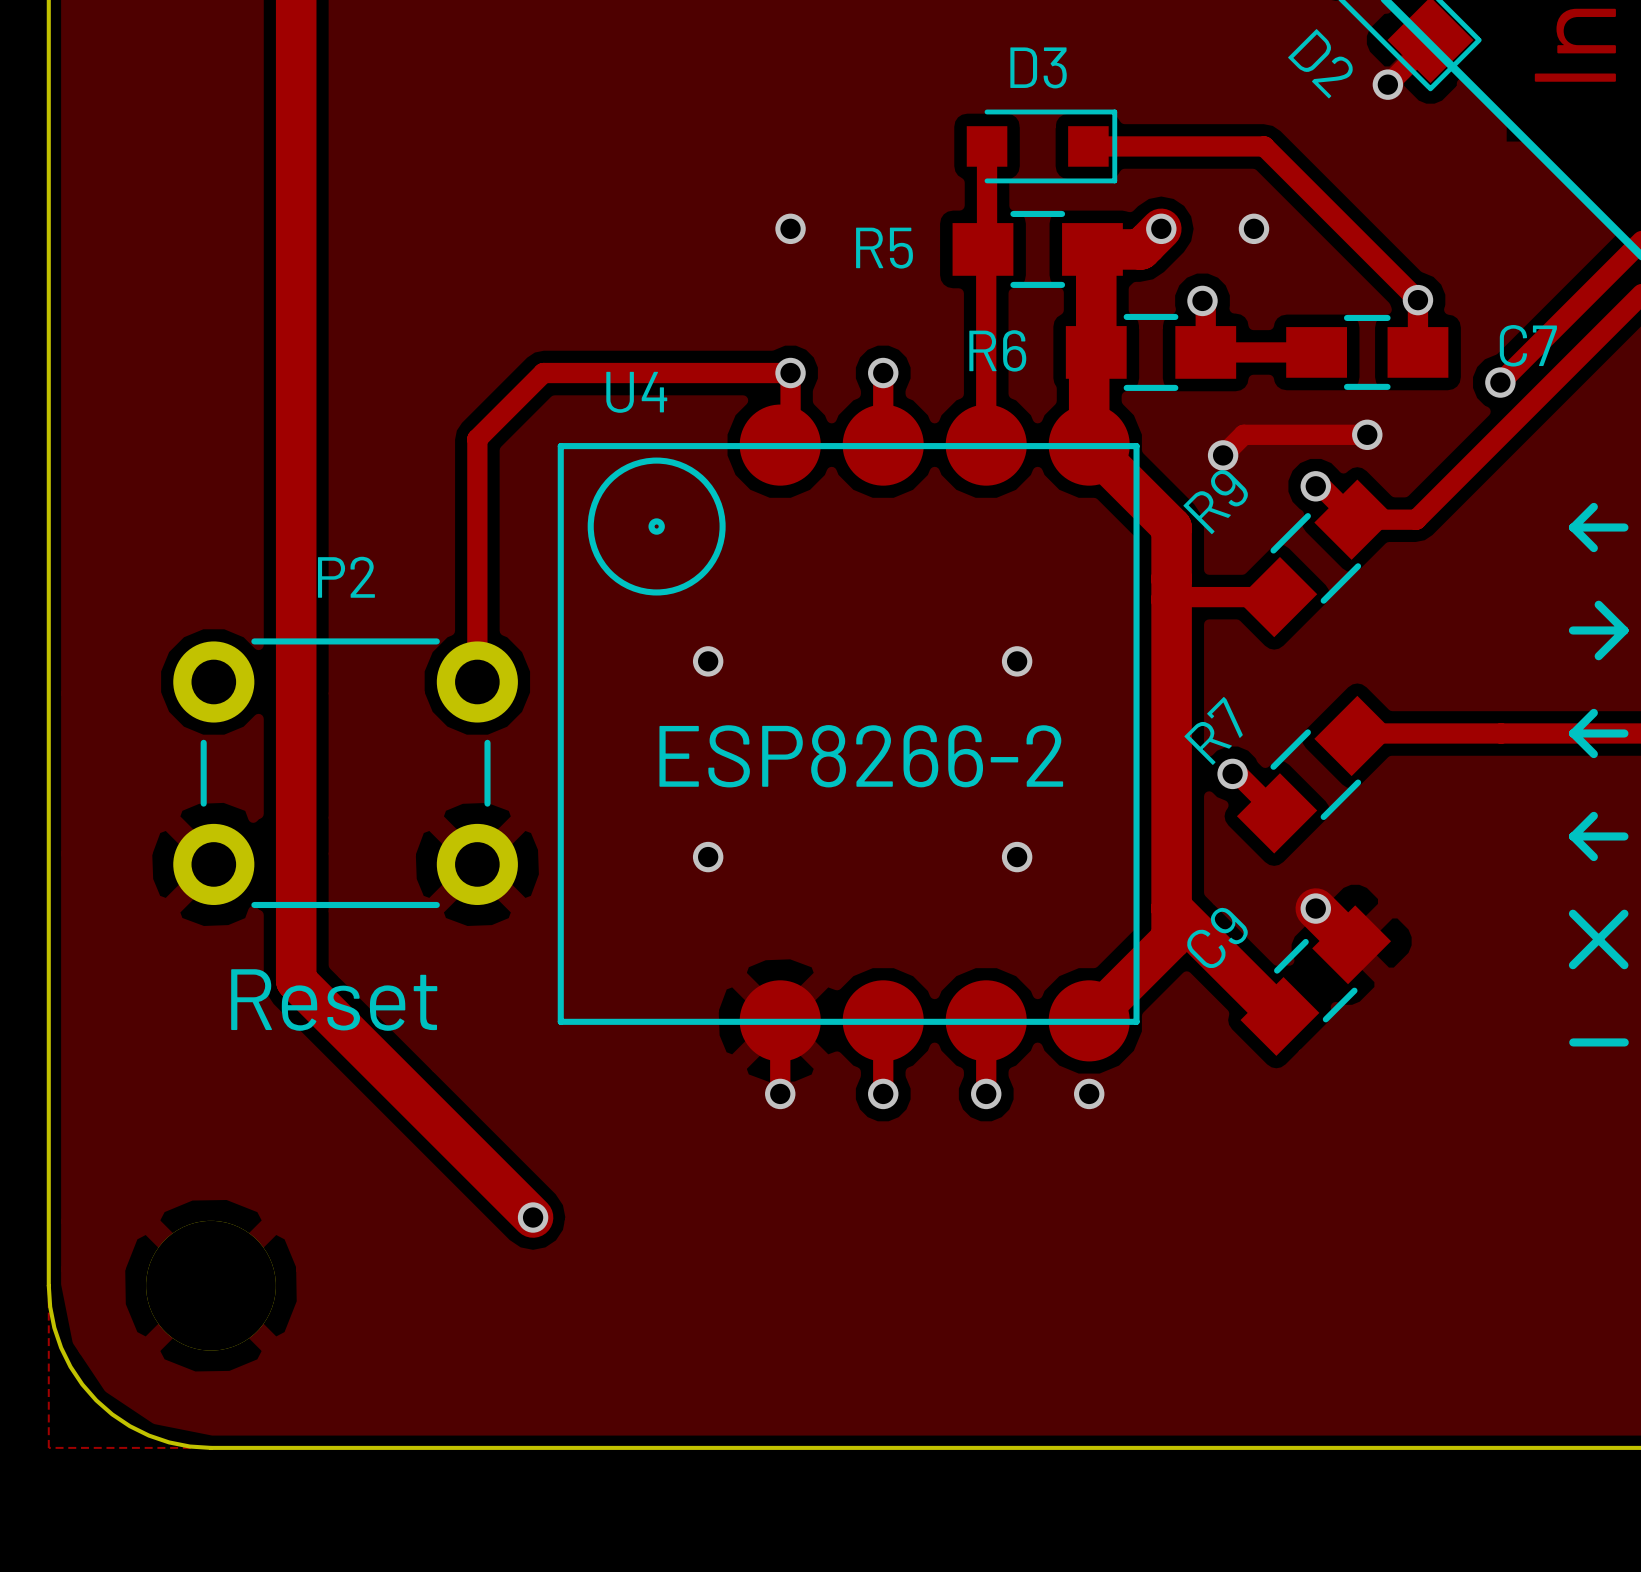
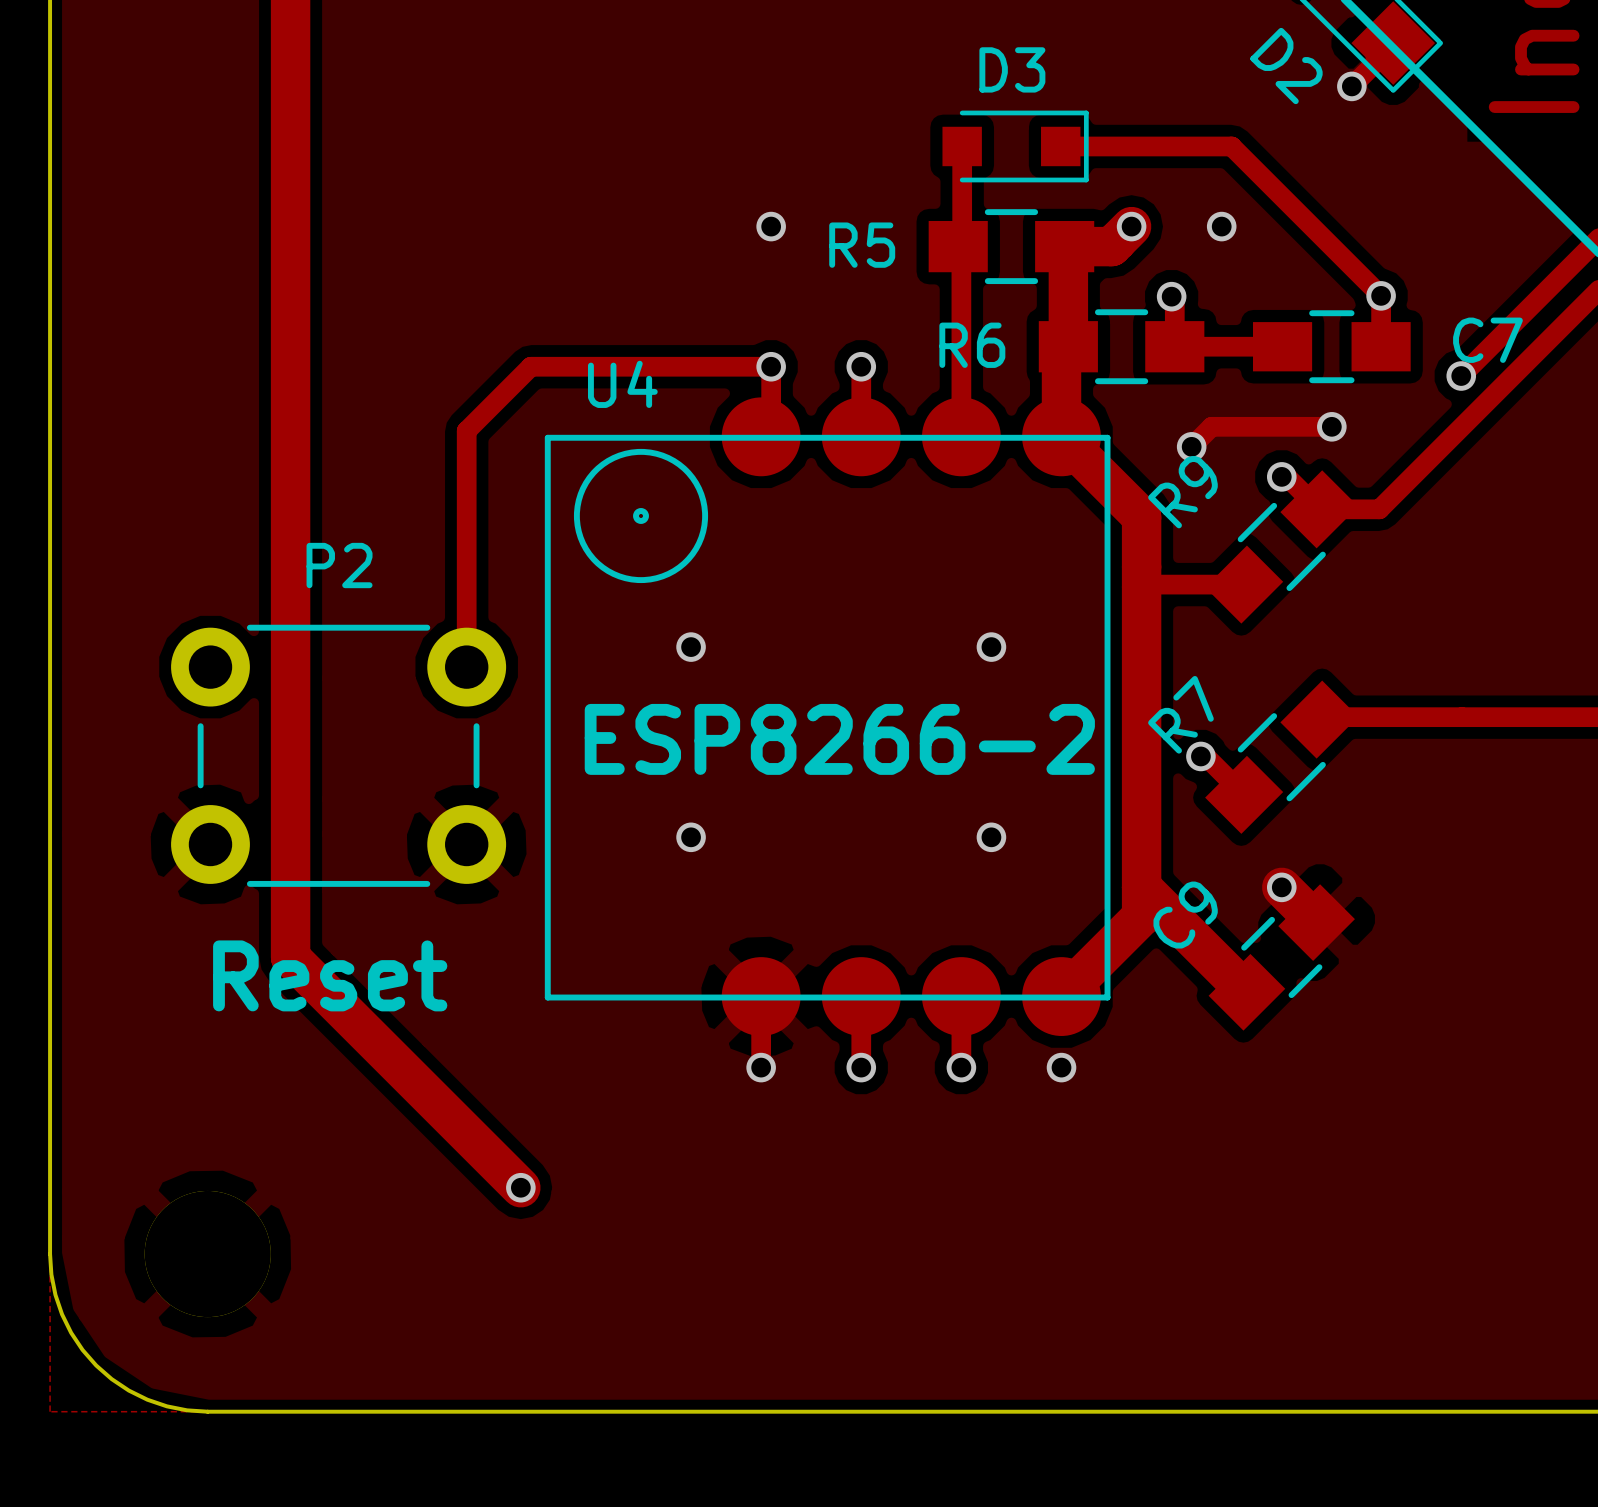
line: (1593, 506) (1573, 527) (1593, 548) -> none
line: (1572, 527) (1624, 527) -> none
line: (1598, 604) (1624, 630) -> none
line: (1572, 630) (1624, 630) -> none
line: (1624, 630) (1598, 656) -> none
line: (1593, 712) (1573, 733) (1593, 754) -> none
line: (1572, 733) (1624, 733) -> none
line: (1593, 815) (1573, 836) (1593, 857) -> none
line: (1572, 836) (1624, 836) -> none
line: (1572, 913) (1624, 965) -> none
line: (1624, 913) (1572, 965) -> none
line: (1573, 1042) (1624, 1042) -> none

